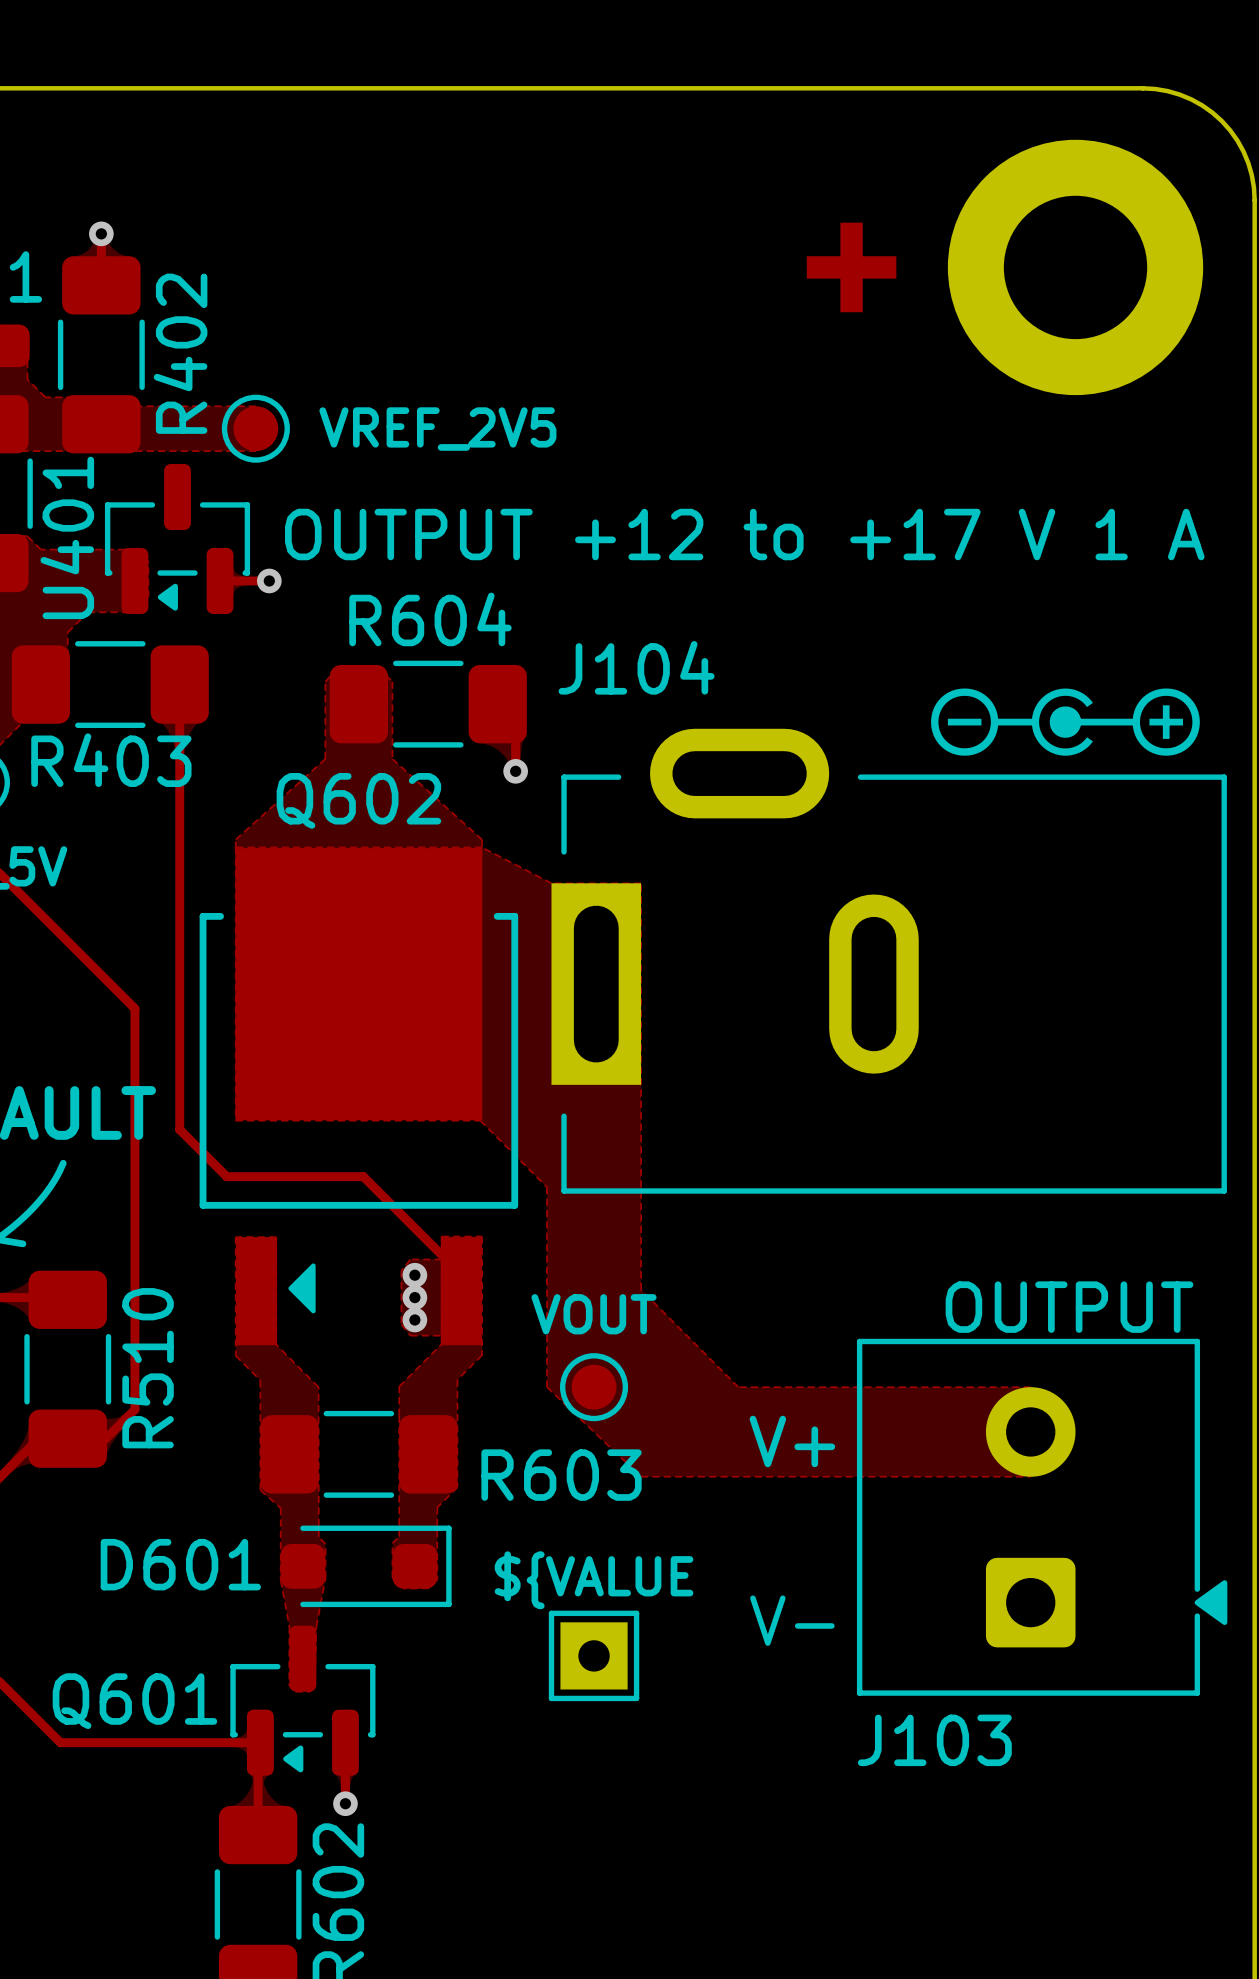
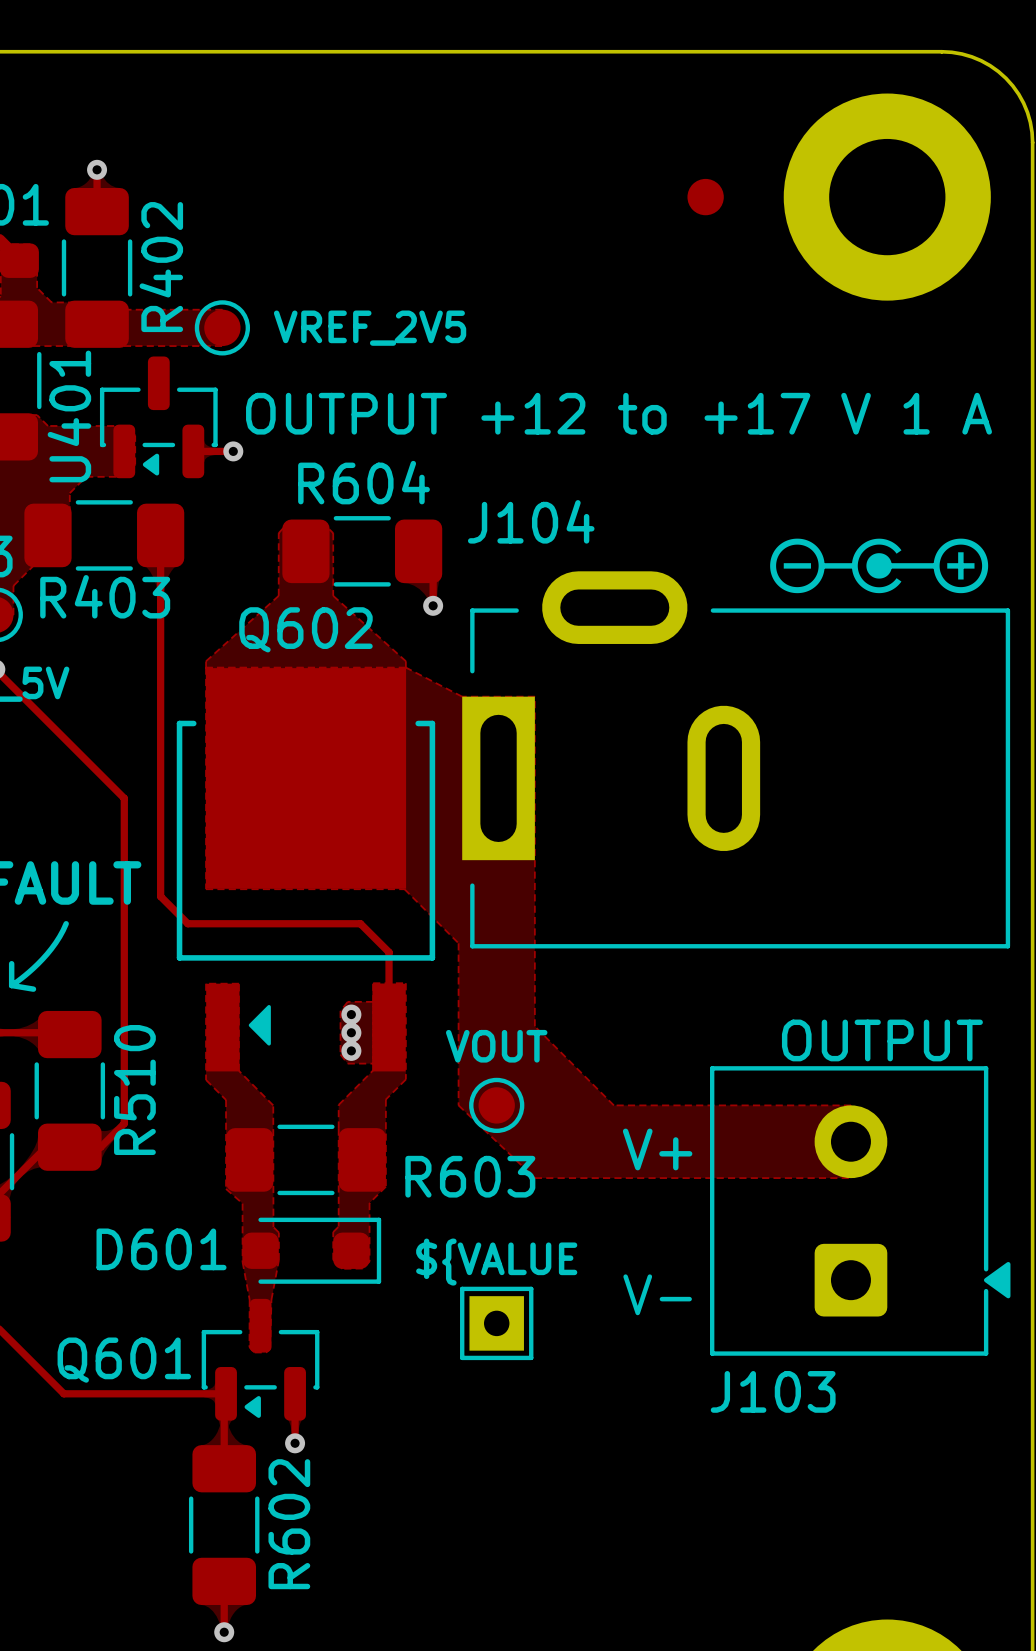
part footprint: [806, 222, 897, 313] -> [687, 178, 724, 216]
track: (213, 1163) (226, 1176) (363, 1176) (461, 1274) -> (187, 923) (360, 923) (389, 952) (389, 1014)

